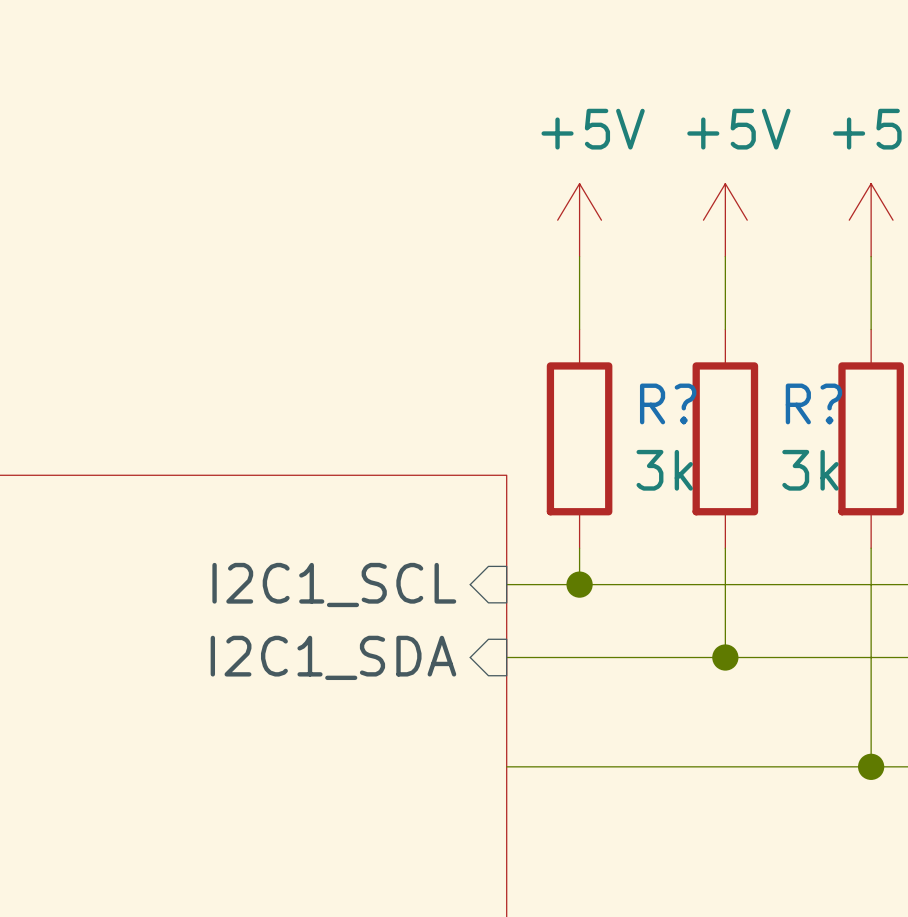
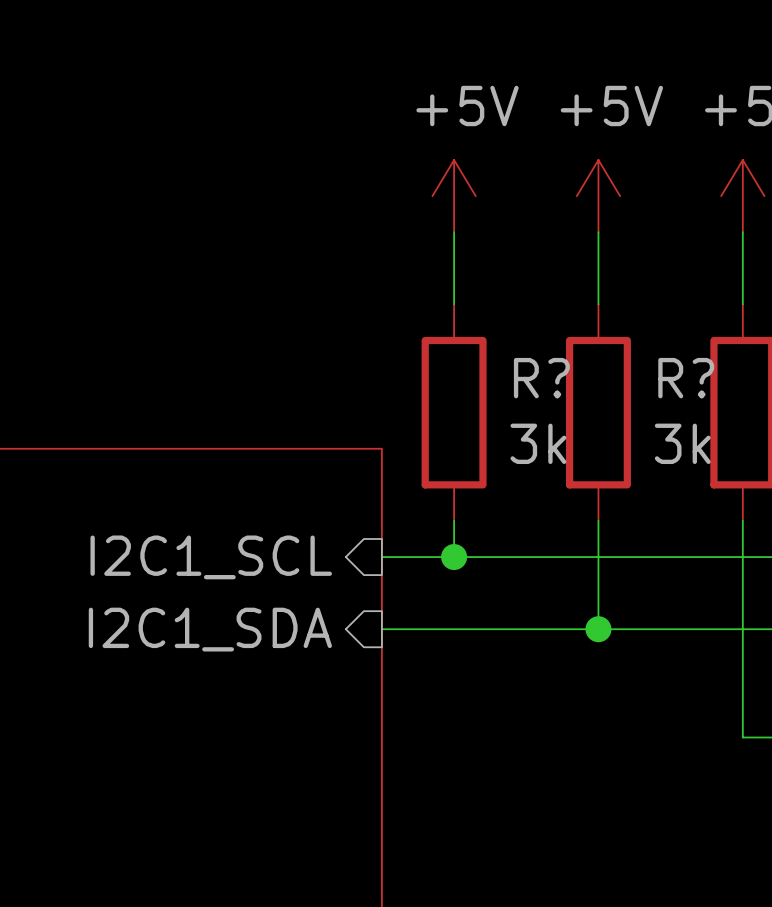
wire: (506, 766) (871, 766) -> none
junction: (871, 766) -> none

